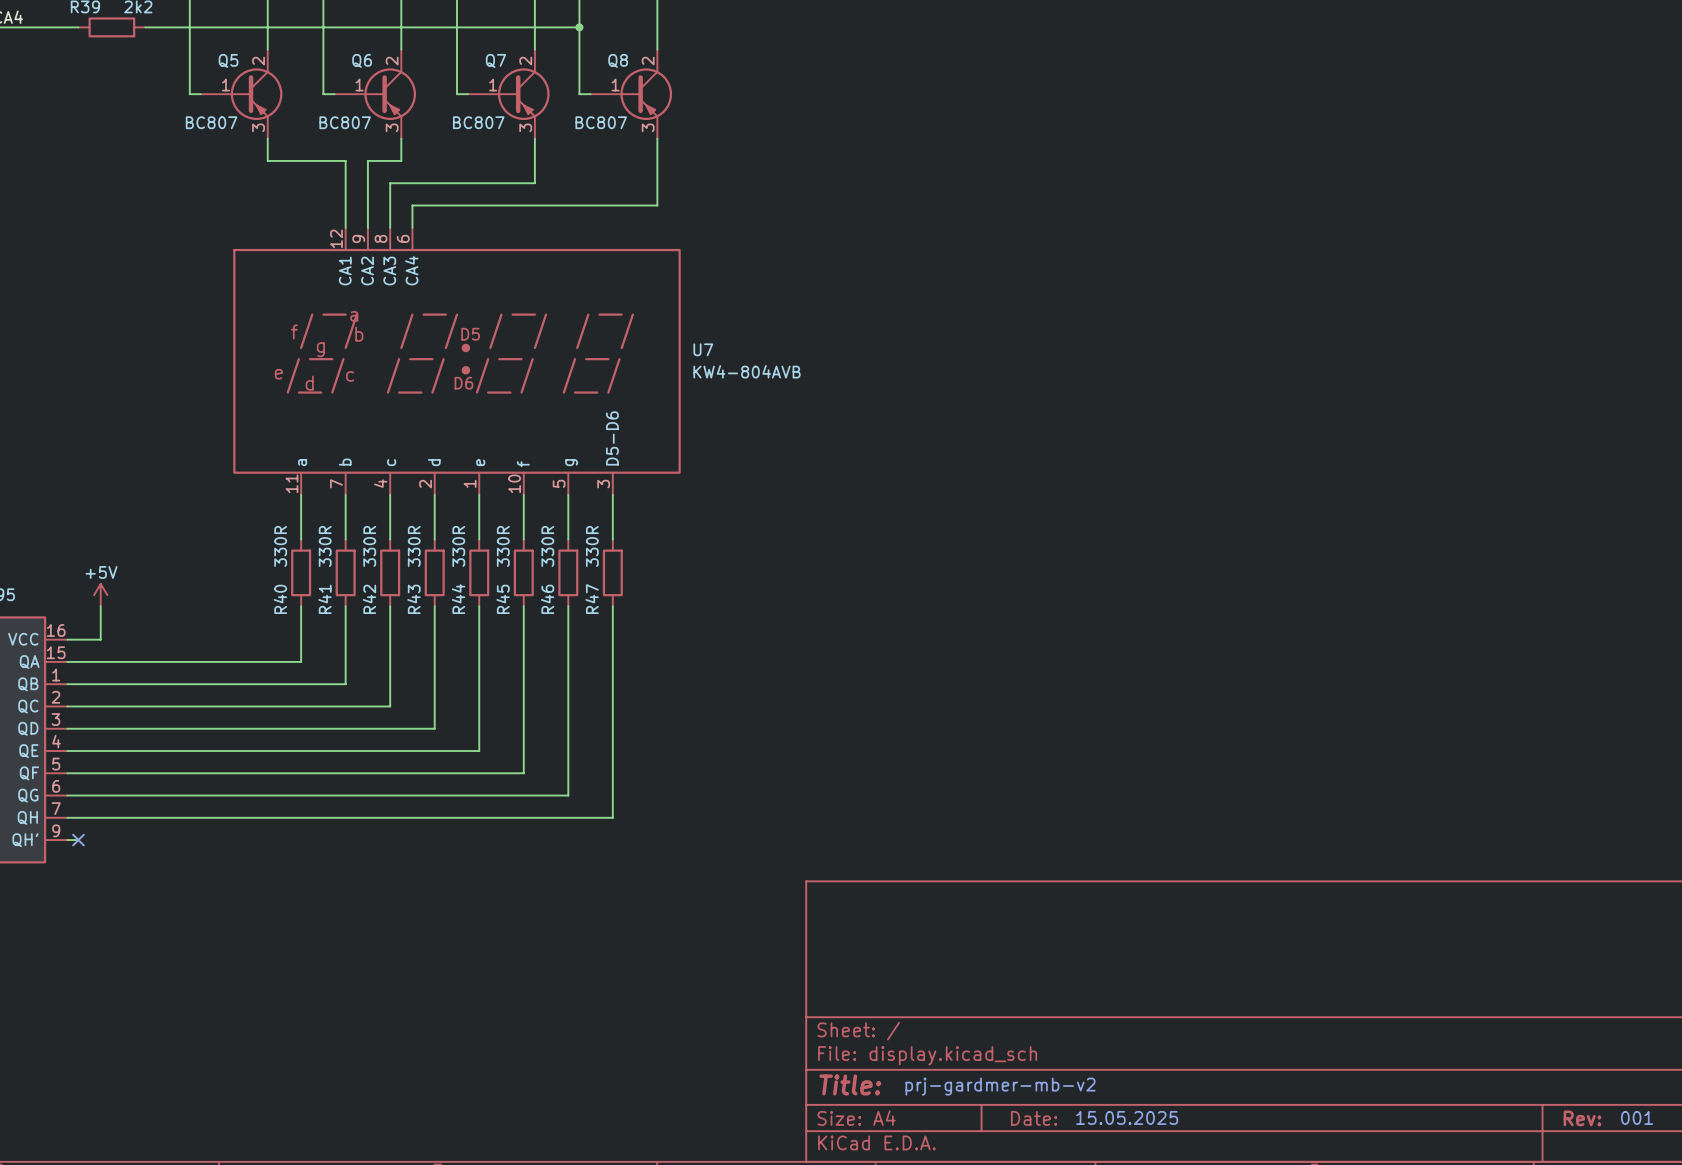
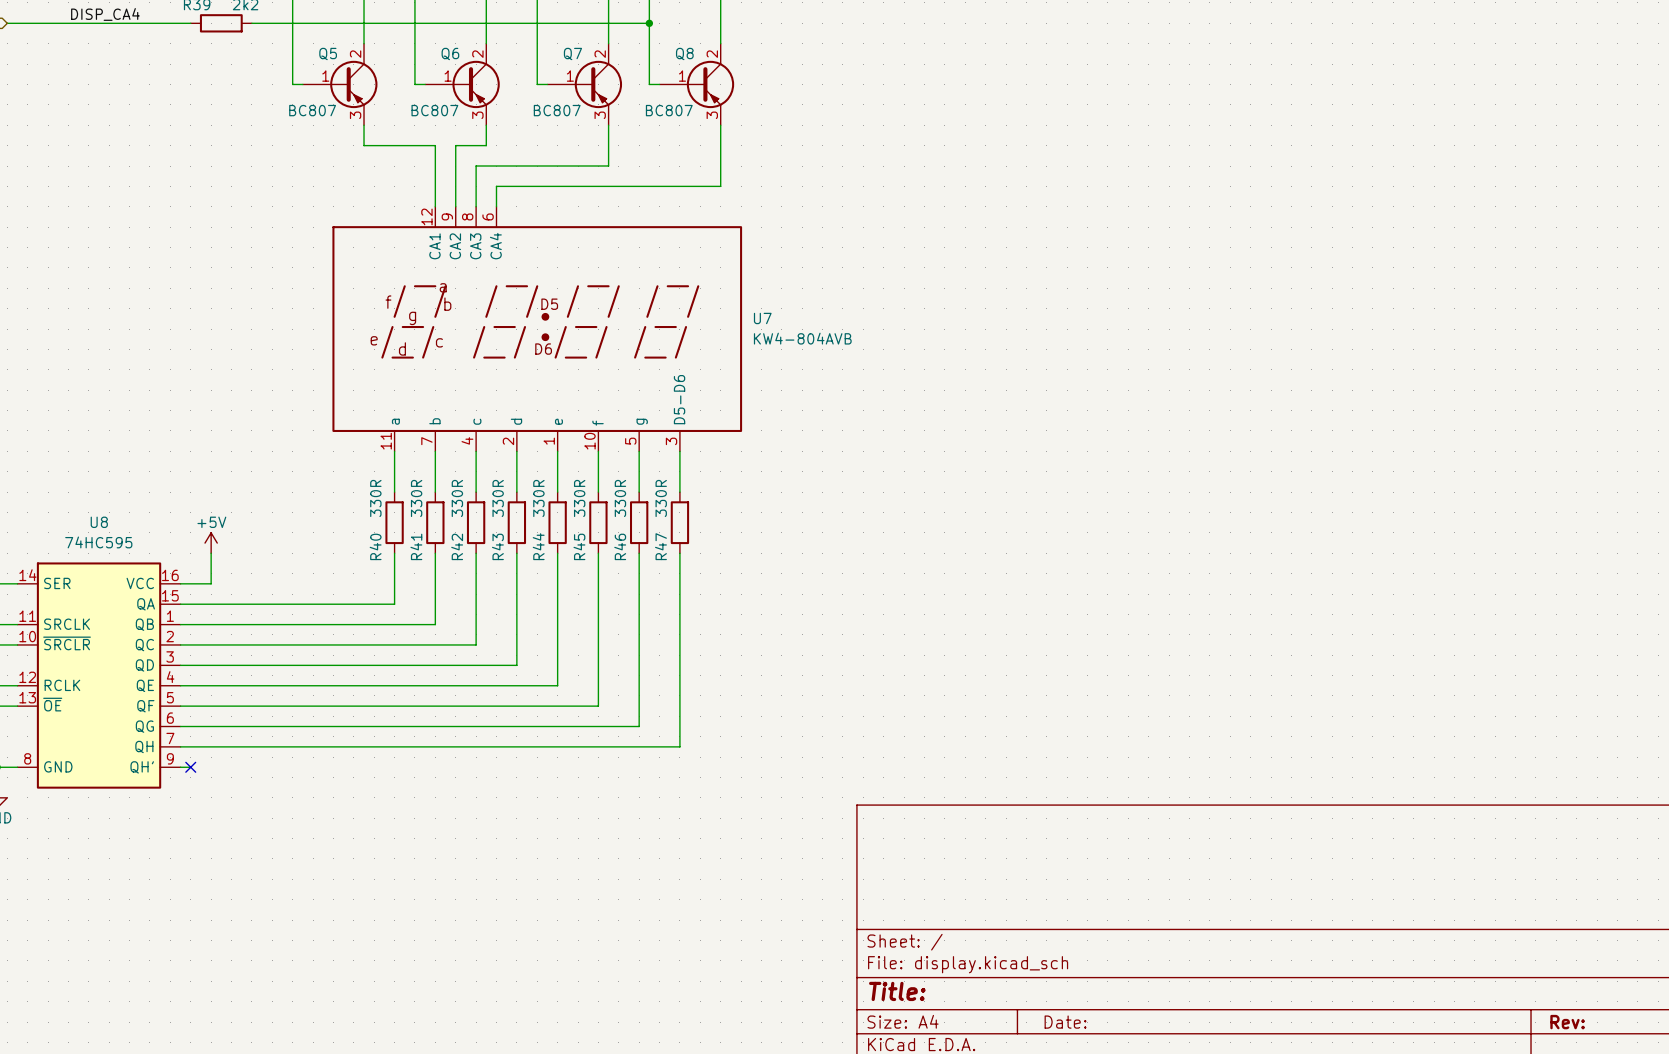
text: prj-gardmer-mb-v2 (1000, 1086) -> none
text: 15.05.2025 (1127, 1117) -> none
text: 001 (1637, 1117) -> none

